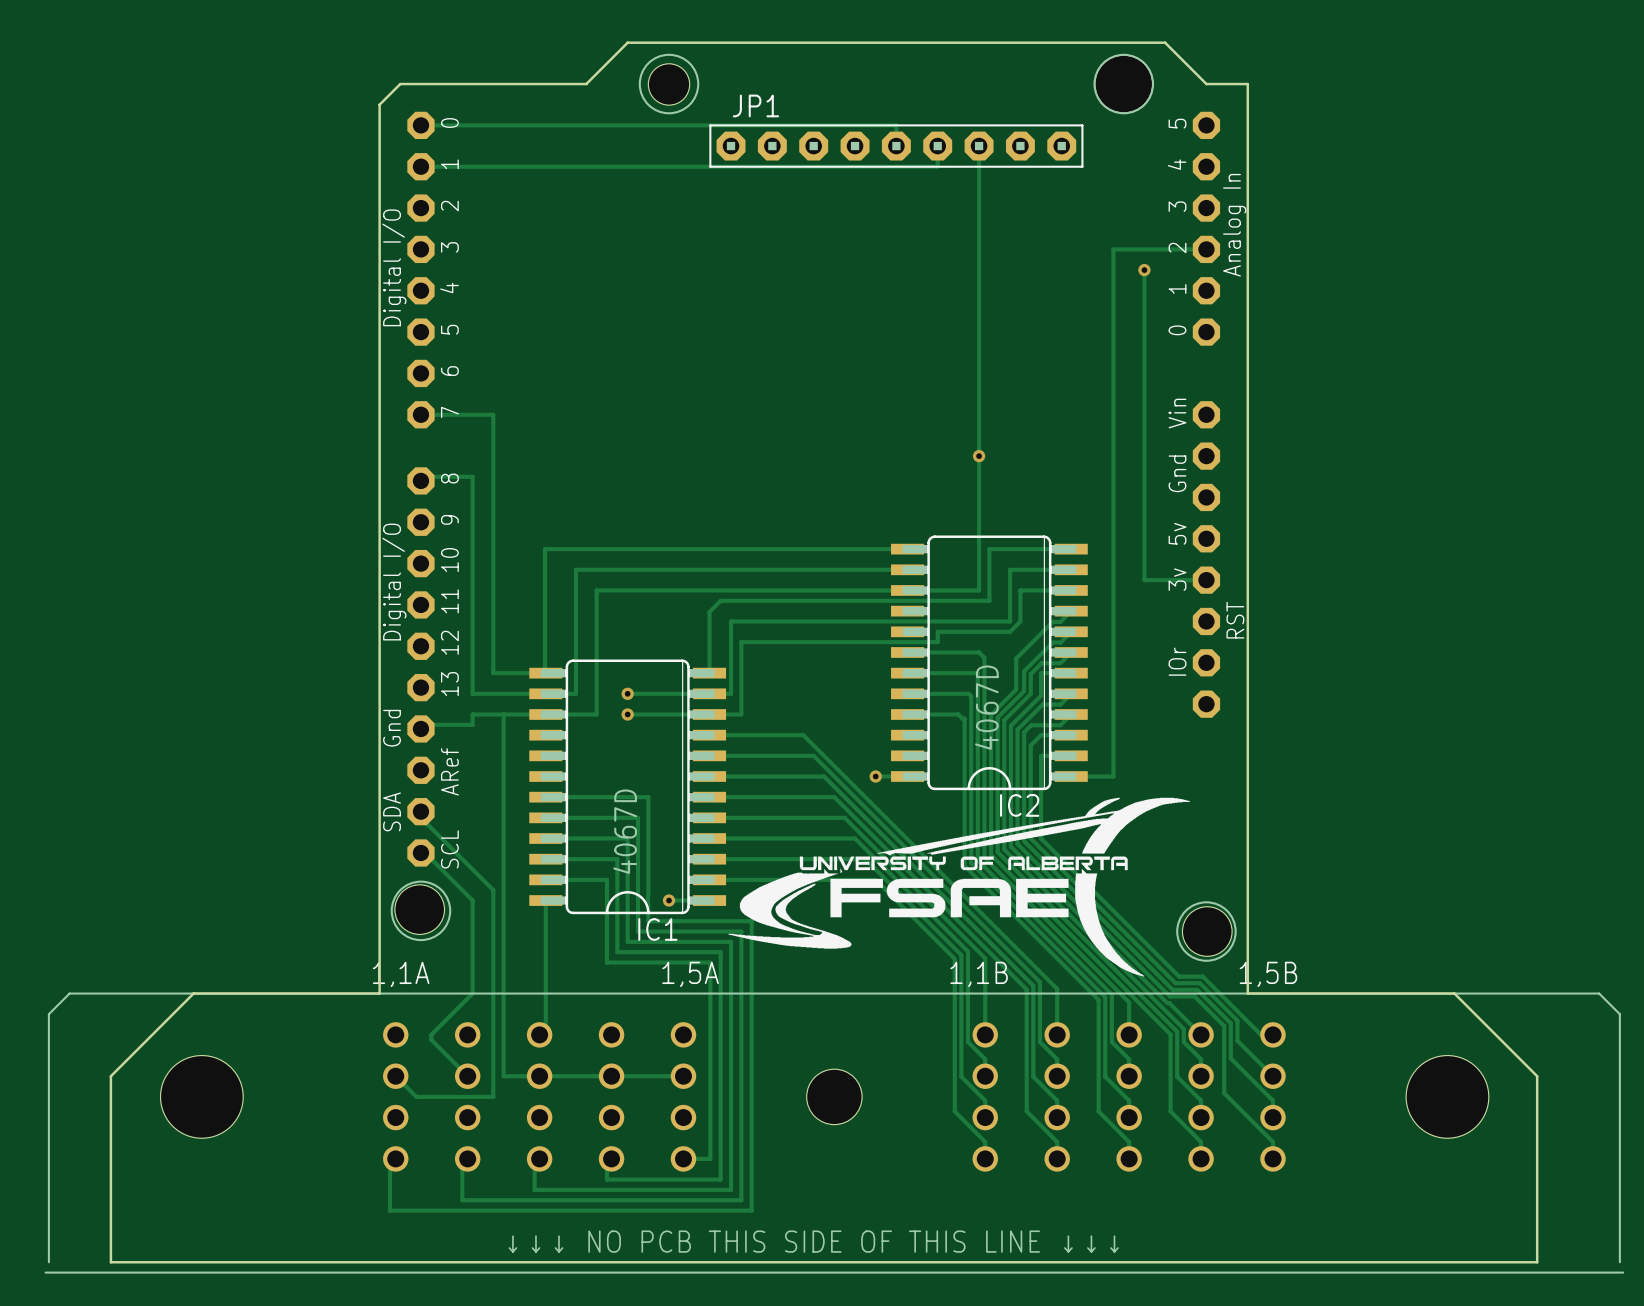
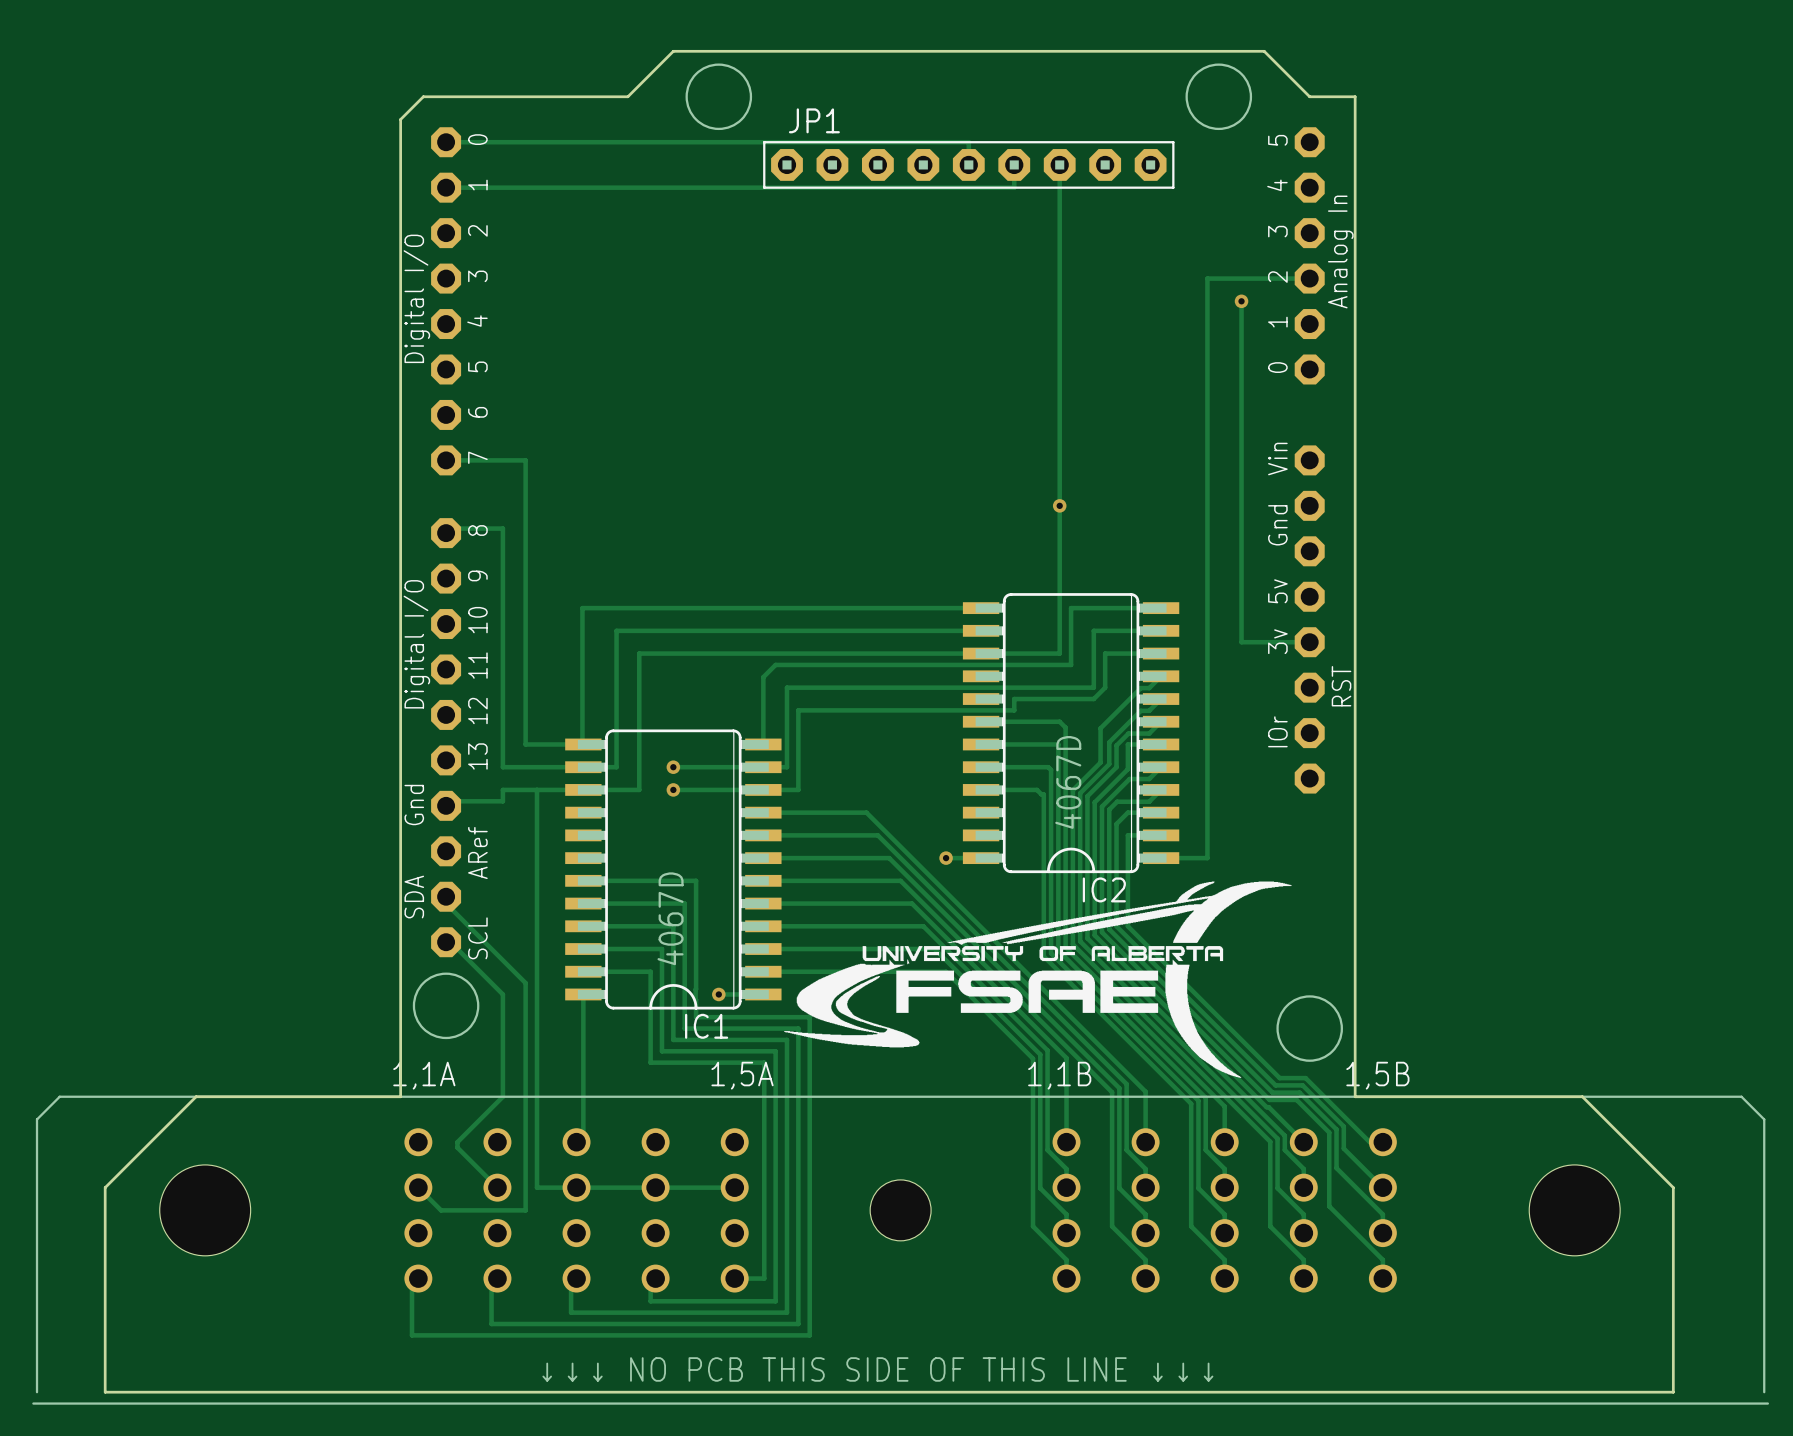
hole: (669, 84) -> none
hole: (1123, 84) -> none
hole: (419, 909) -> none
hole: (1207, 931) -> none

